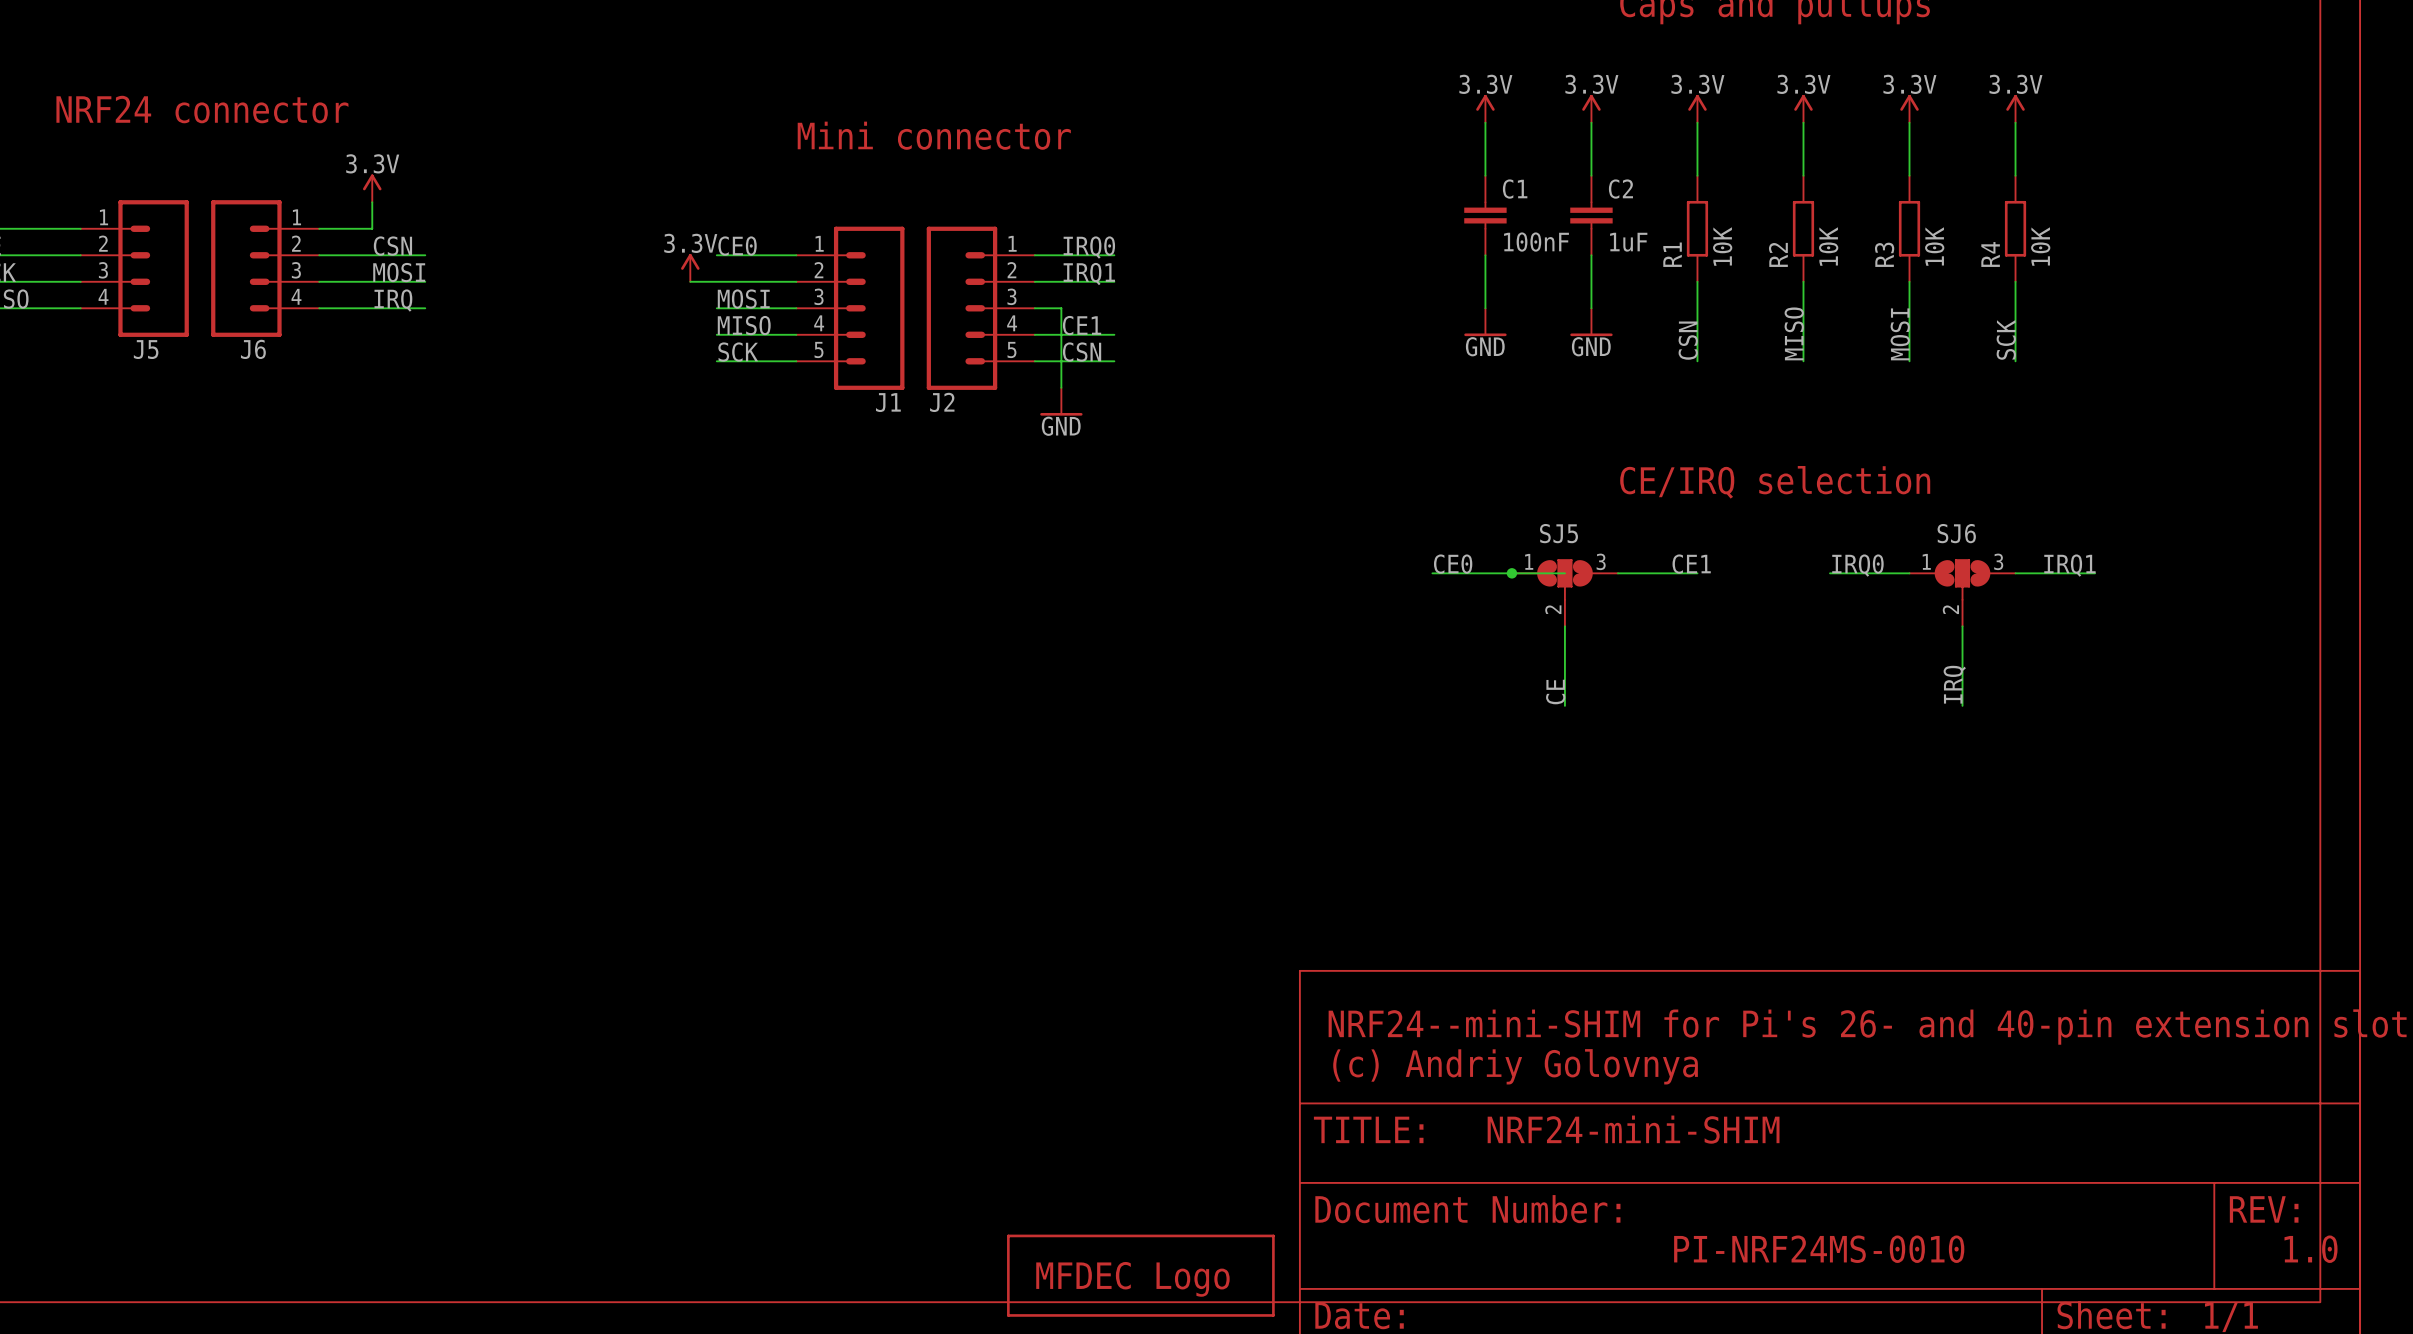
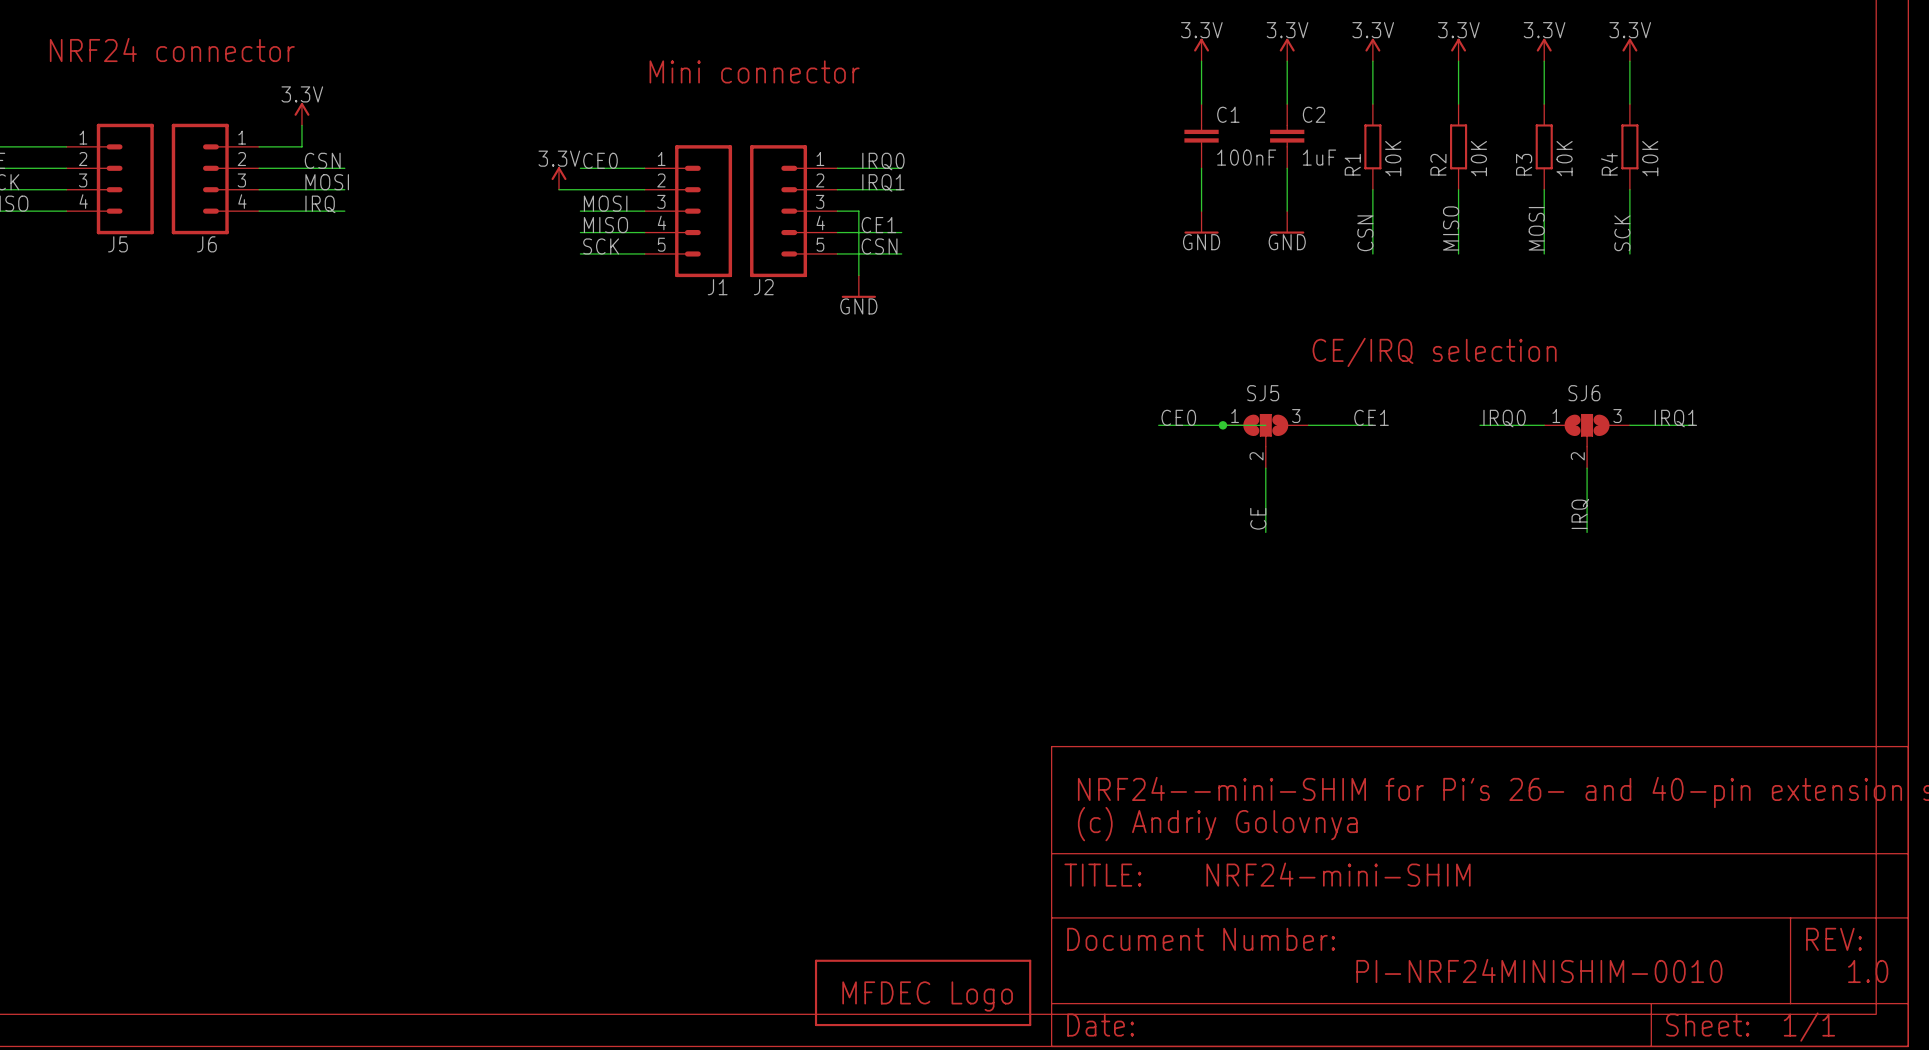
text: PI-NRF24MS-0010 (1819, 1249) -> PI-NRF24MINISHIM-0010 (1539, 970)

